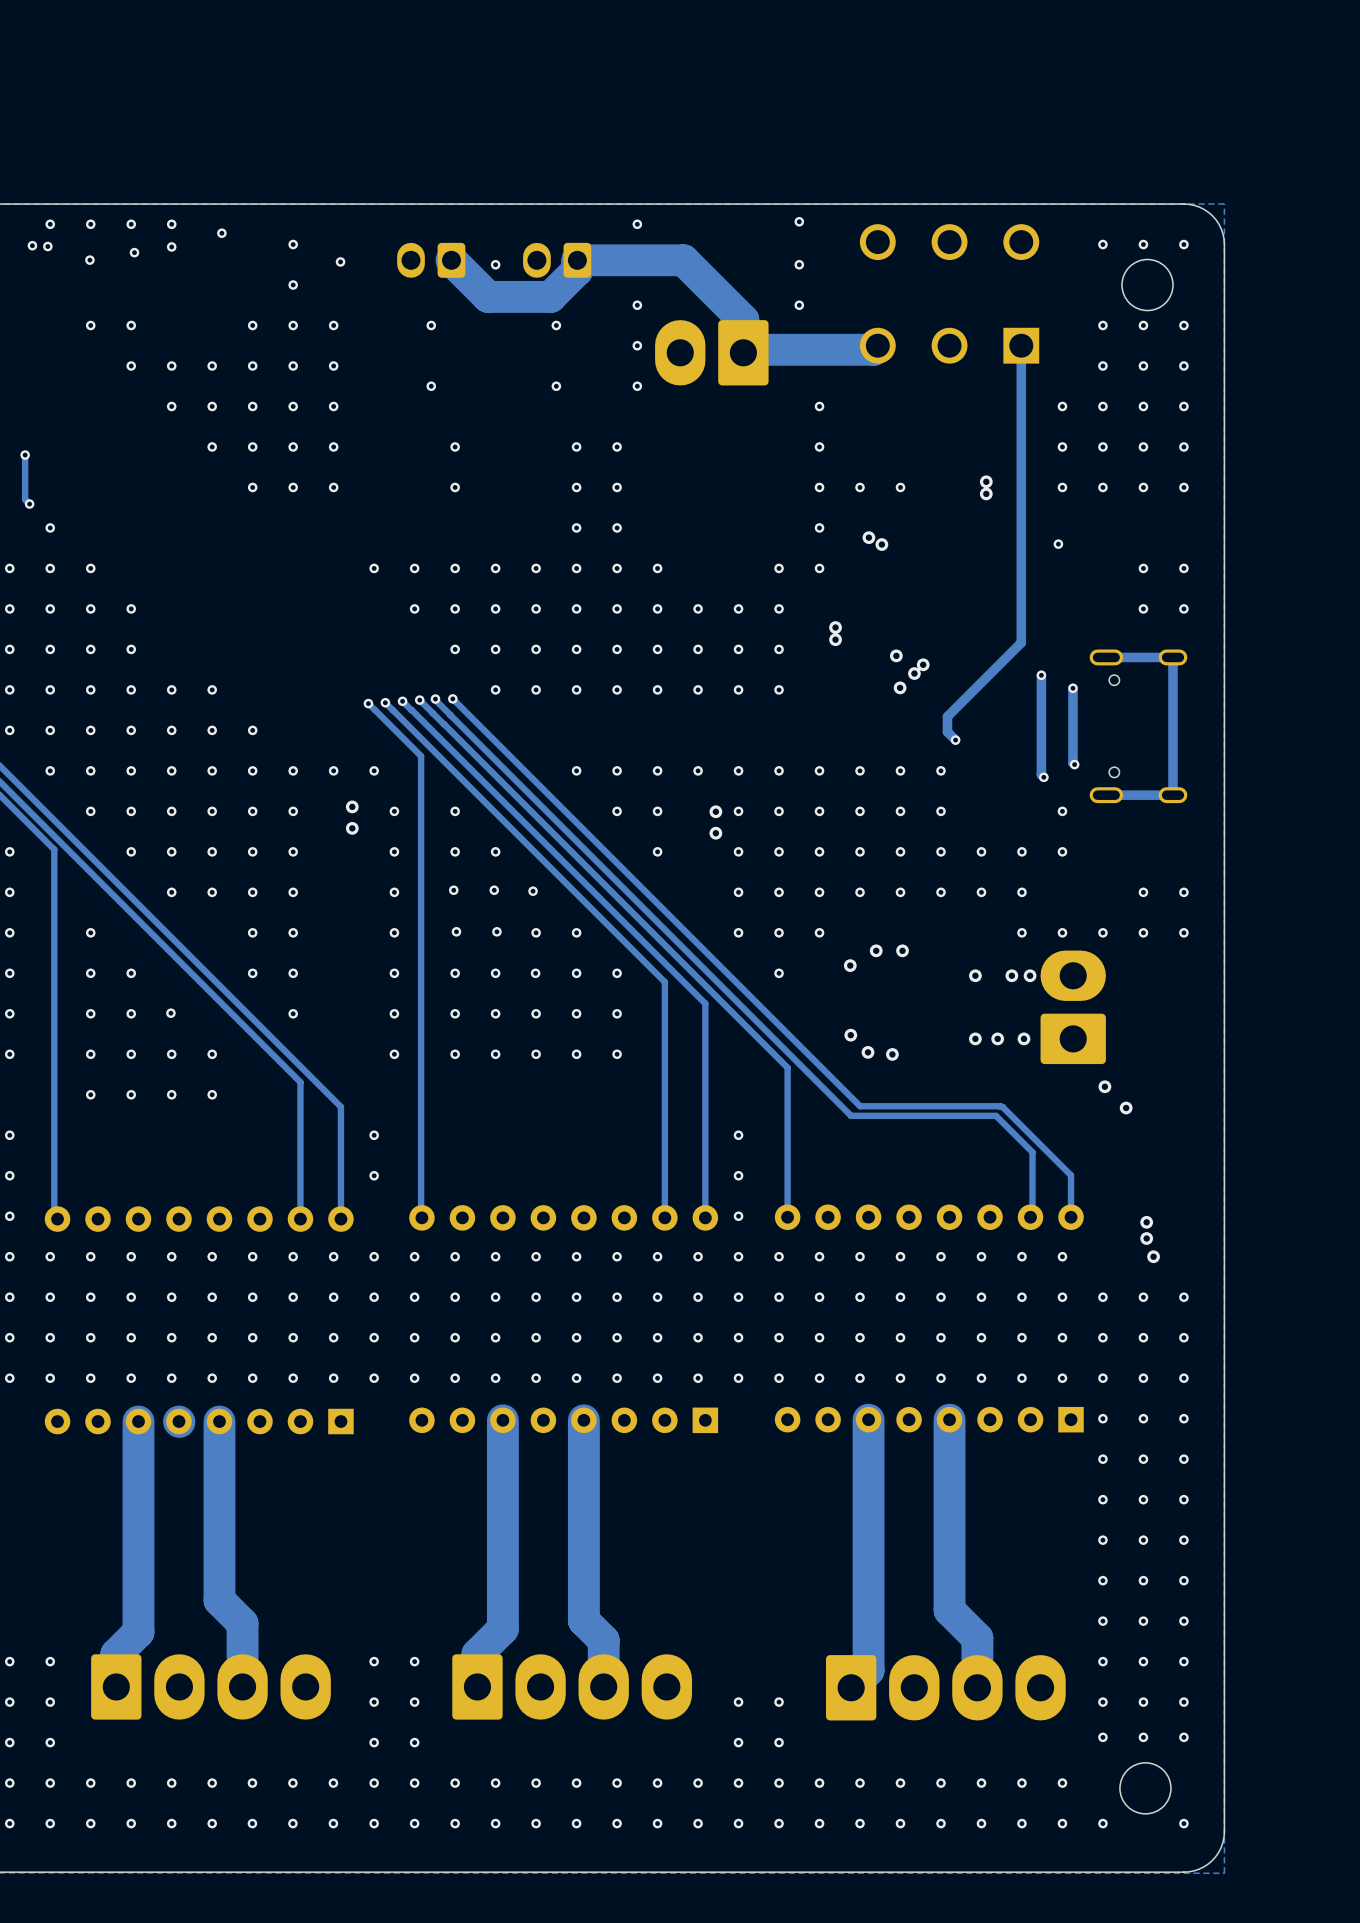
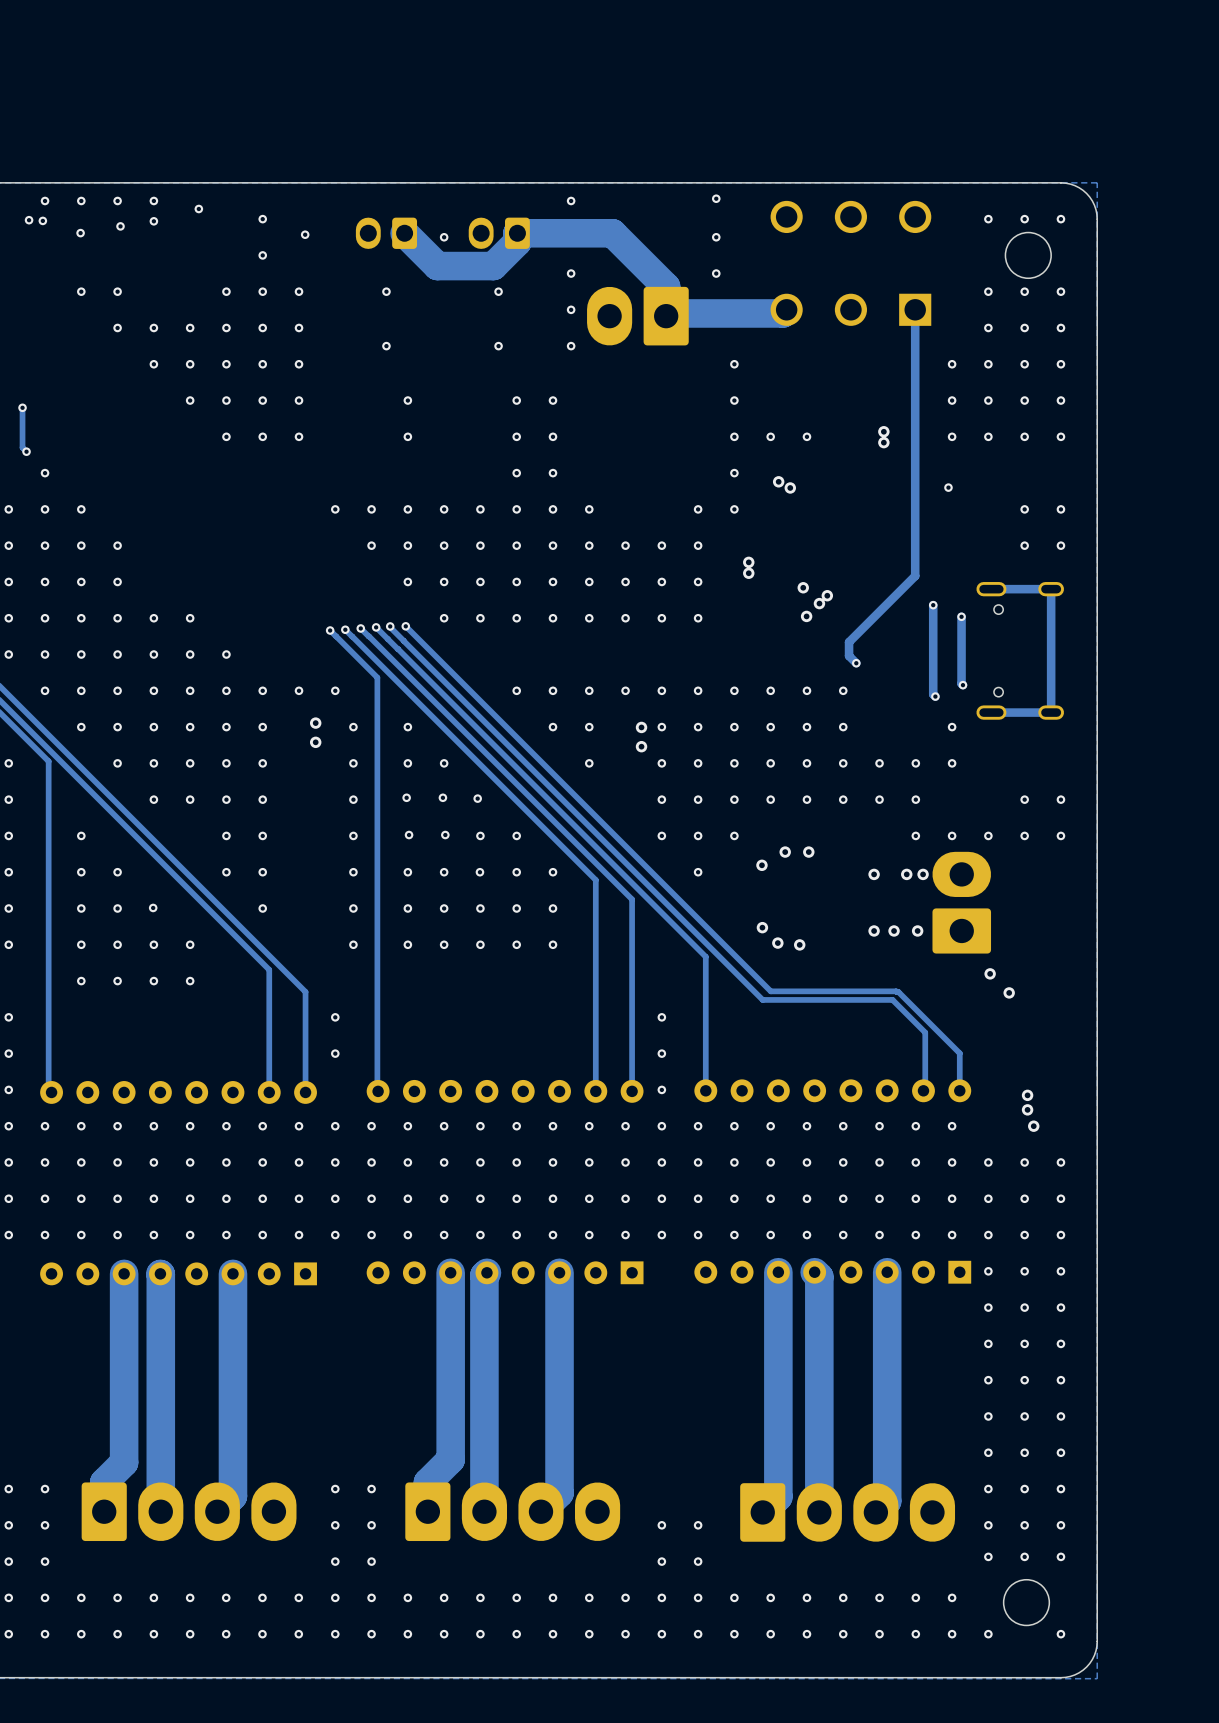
track: none -> (814, 1272) (819, 1276) (819, 1512)
track: (949, 1419) (949, 1610) (977, 1638) (977, 1687) -> (887, 1272) (887, 1501) (875, 1512)
track: none -> (486, 1272) (484, 1275) (484, 1511)
track: (583, 1420) (583, 1620) (603, 1640) (603, 1686) -> (559, 1272) (559, 1493) (541, 1511)
track: none -> (160, 1274) (160, 1511)
track: (219, 1421) (219, 1600) (242, 1623) (242, 1686) -> (232, 1273) (232, 1496) (217, 1511)

